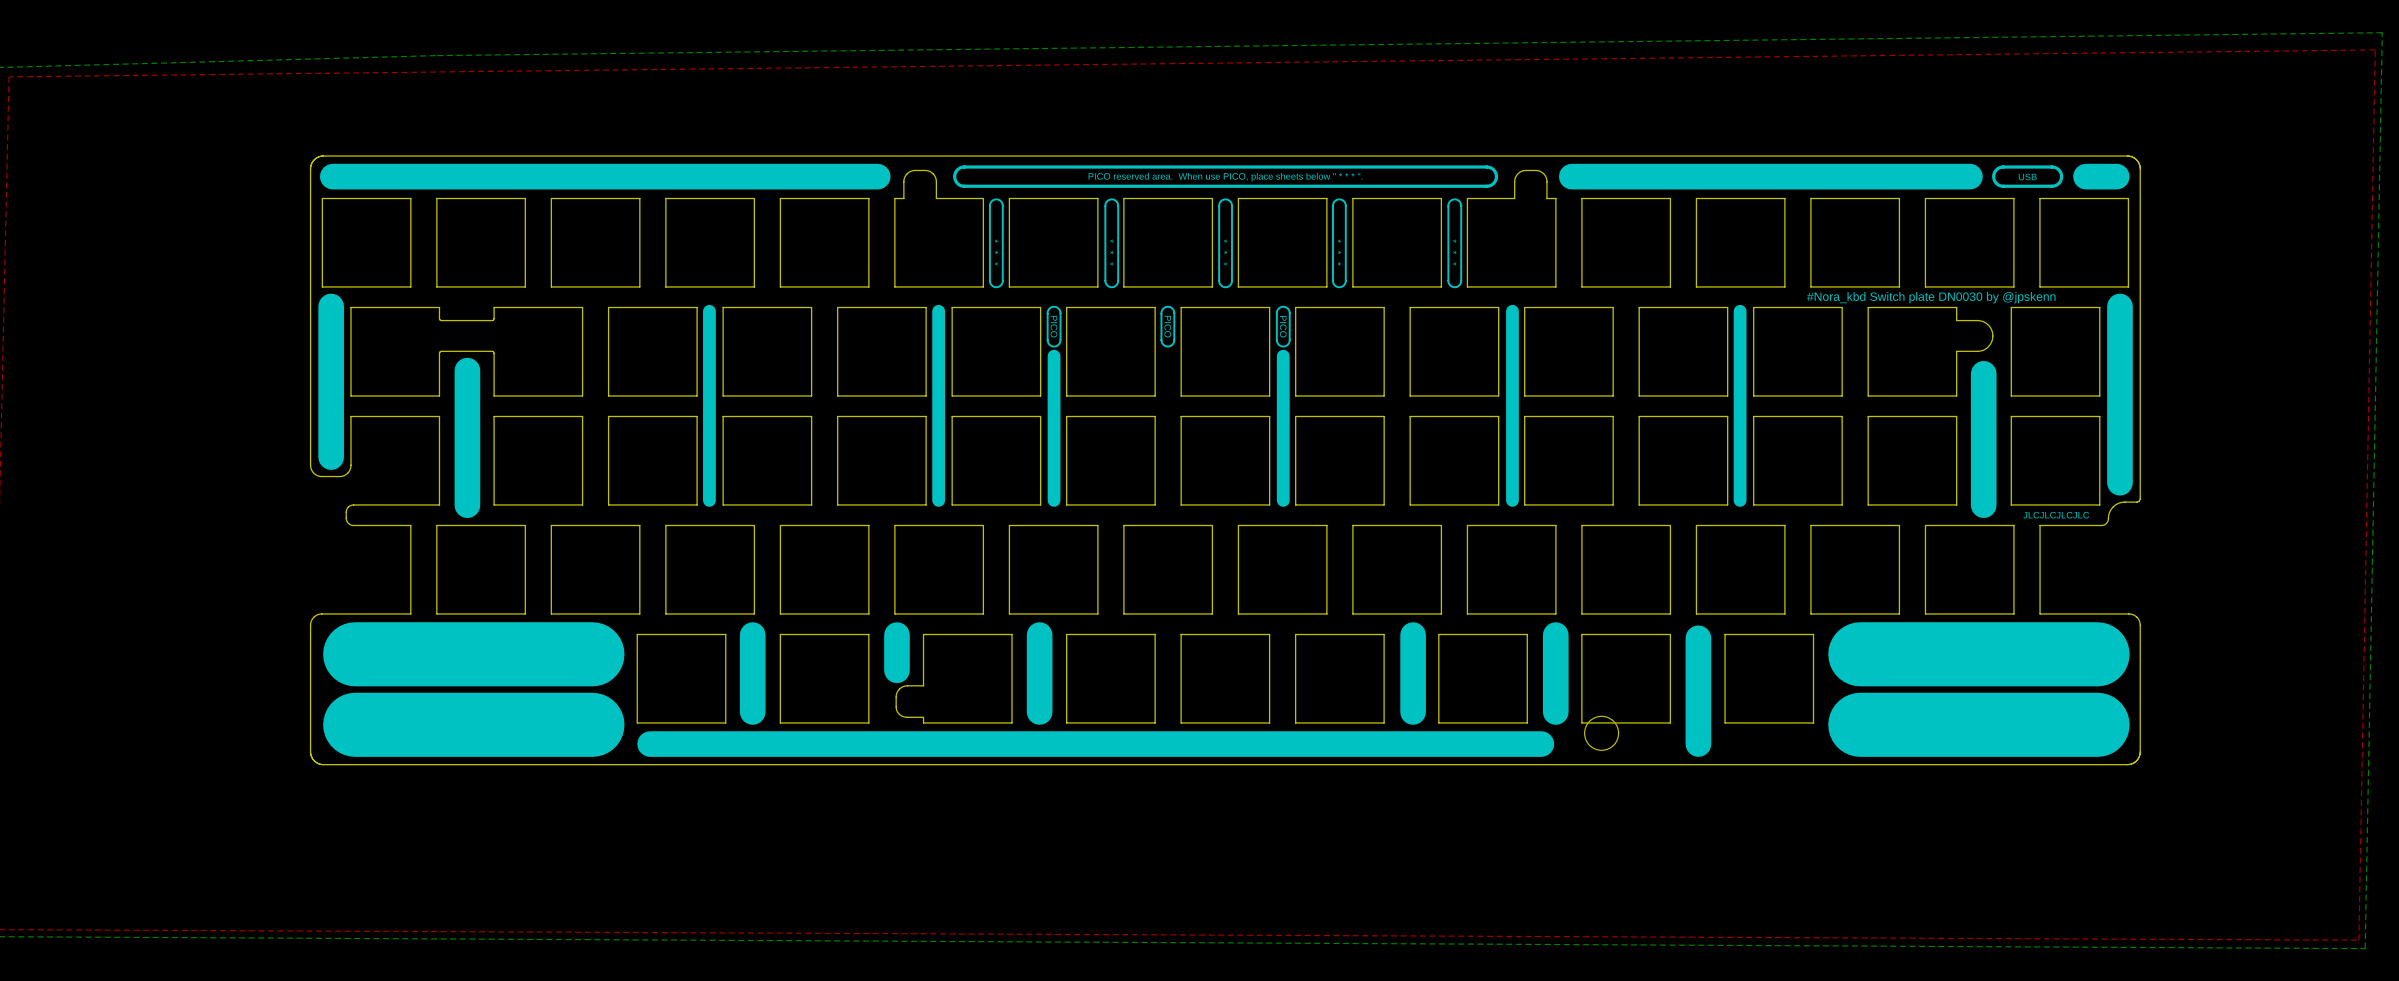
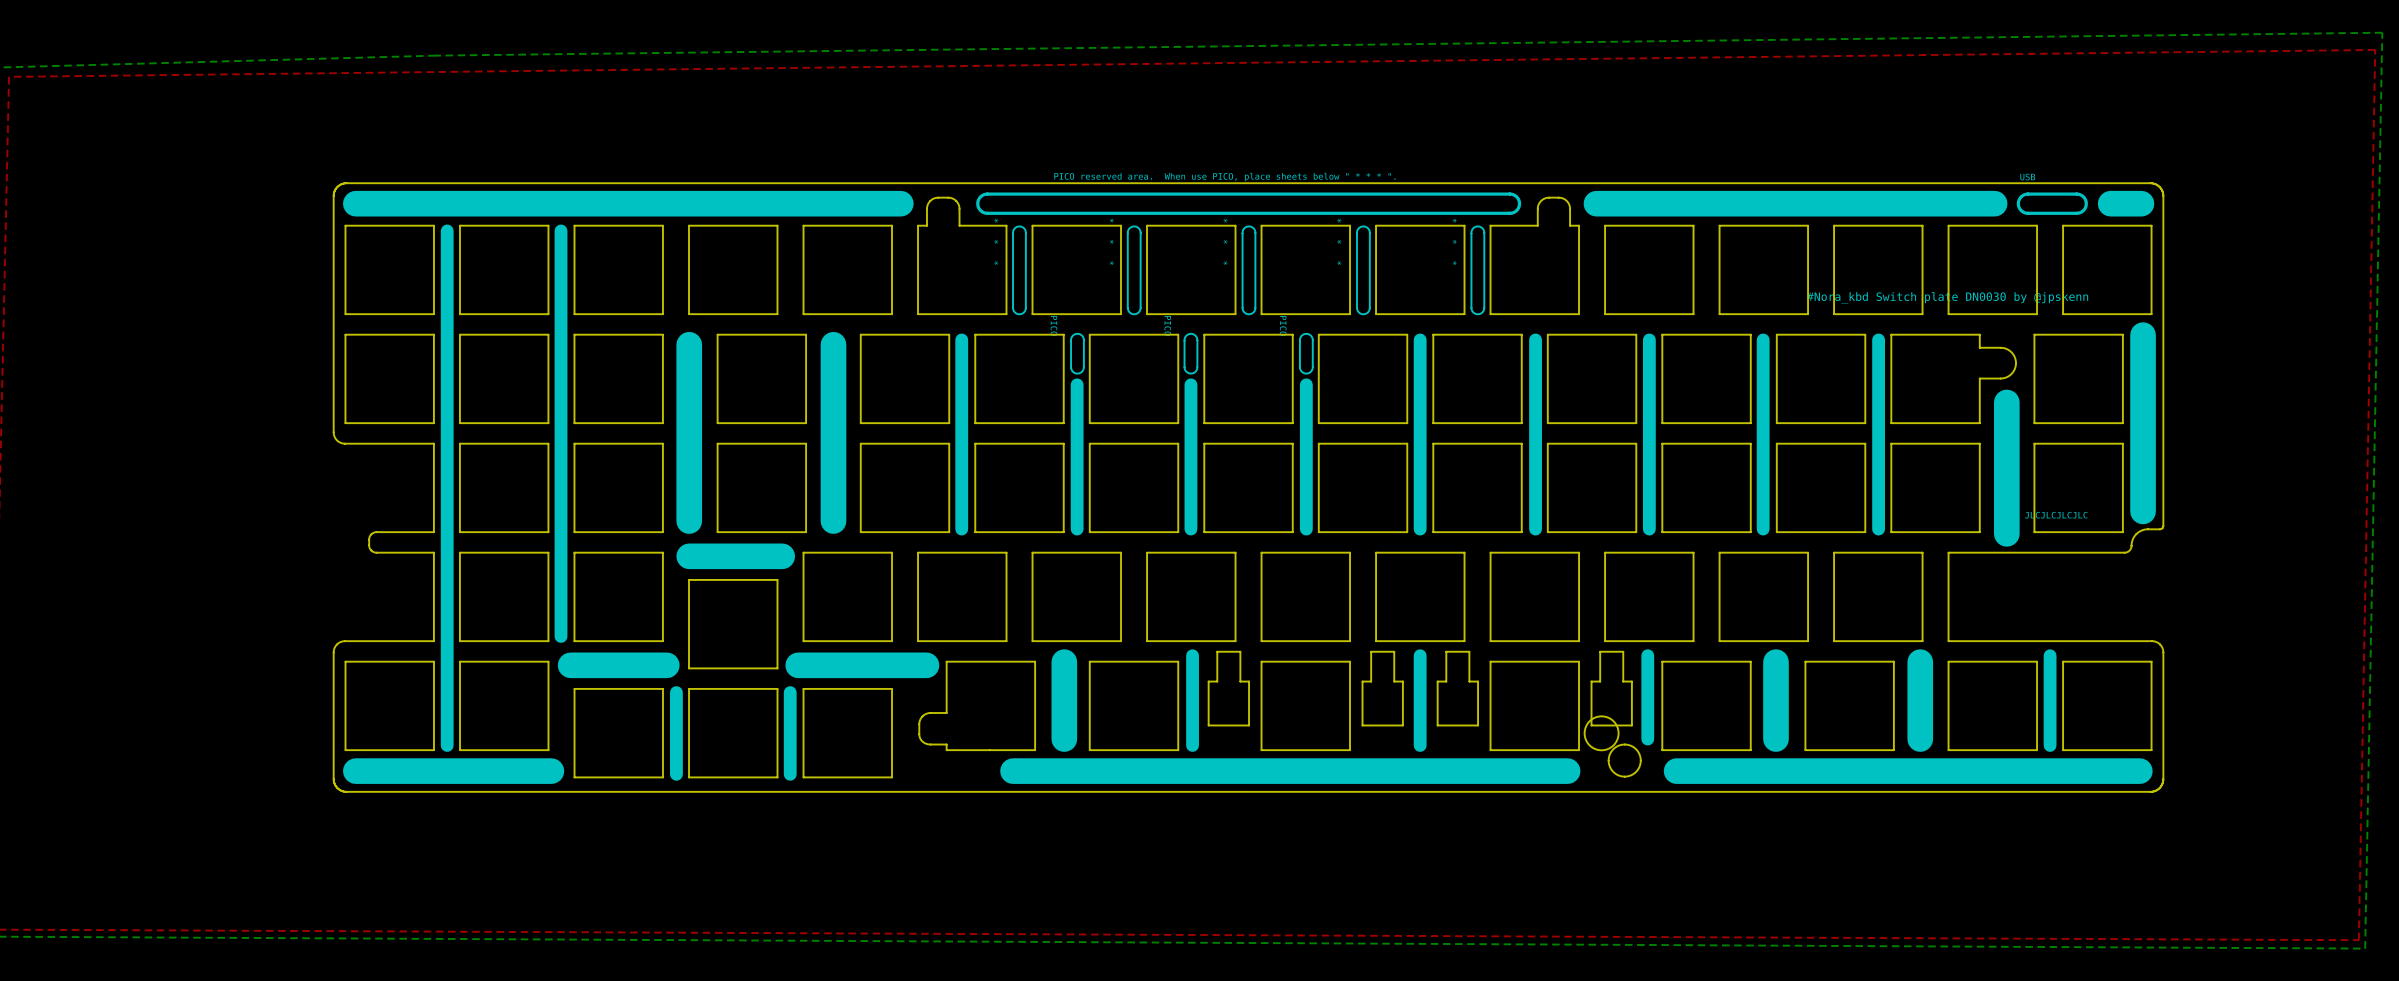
drawing: [309, 155, 2141, 766] -> none
line: (1486, 167) (964, 167) (957, 169) (954, 176) (957, 183) (964, 186) (1486, 186) (1493, 183) (1496, 176) (1493, 169) (1486, 167) -> (1509, 194) (987, 194) (980, 196) (977, 203) (980, 210) (987, 213) (1509, 213) (1516, 210) (1519, 203) (1516, 196) (1509, 194)
line: (2052, 167) (2002, 167) (1995, 170) (1993, 177) (1996, 183) (2002, 186) (2053, 186) (2058, 183) (2061, 176) (2058, 169) (2052, 167) -> (2076, 194) (2026, 194) (2020, 197) (2018, 204) (2021, 210) (2026, 213) (2077, 213) (2083, 210) (2086, 203) (2083, 196) (2076, 194)
line: (877, 176) (332, 176) -> (900, 203) (355, 203)
line: (1969, 176) (1571, 176) -> (1994, 203) (1596, 203)
line: (2116, 176) (2085, 176) -> (2141, 203) (2110, 203)
board edge: none -> (948, 197) (936, 197) (930, 200) (927, 207) (926, 225) (918, 225) (918, 314) (1006, 314) (1006, 225) (959, 225) (958, 204) (954, 199) (948, 197)
board edge: none -> (1558, 197) (1546, 197) (1540, 201) (1537, 207) (1537, 225) (1490, 225) (1490, 314) (1579, 314) (1579, 225) (1570, 225) (1569, 204) (1565, 199) (1558, 197)
line: (1002, 205) (1002, 281) (1000, 285) (995, 287) (989, 281) (989, 204) (992, 200) (996, 199) (1001, 201) (1002, 205) -> (1025, 232) (1025, 308) (1023, 312) (1018, 314) (1013, 308) (1013, 231) (1015, 227) (1019, 226) (1024, 228) (1025, 232)
line: (1118, 205) (1118, 281) (1116, 285) (1110, 287) (1105, 281) (1105, 204) (1107, 200) (1112, 199) (1116, 201) (1118, 205) -> (1140, 232) (1140, 308) (1138, 312) (1133, 314) (1127, 308) (1127, 231) (1130, 227) (1134, 226) (1138, 228) (1140, 232)
line: (1232, 205) (1231, 281) (1229, 285) (1224, 287) (1219, 281) (1219, 204) (1221, 200) (1226, 199) (1230, 201) (1232, 205) -> (1255, 232) (1255, 308) (1253, 312) (1248, 314) (1242, 308) (1242, 231) (1244, 227) (1249, 226) (1253, 228) (1255, 232)
line: (1345, 205) (1345, 281) (1343, 285) (1338, 287) (1333, 281) (1333, 204) (1335, 200) (1339, 199) (1344, 201) (1345, 205) -> (1369, 232) (1369, 308) (1367, 312) (1362, 314) (1357, 308) (1357, 231) (1359, 227) (1363, 226) (1368, 228) (1369, 232)
line: (1461, 205) (1461, 281) (1458, 286) (1454, 287) (1448, 281) (1448, 204) (1450, 200) (1455, 199) (1459, 201) (1461, 205) -> (1484, 232) (1484, 308) (1481, 313) (1477, 314) (1471, 308) (1471, 231) (1473, 227) (1478, 226) (1482, 228) (1484, 232)
board edge: none -> (433, 225) (433, 314) (345, 314) (345, 225) (433, 225)
board edge: none -> (548, 225) (548, 314) (459, 314) (459, 225) (548, 225)
board edge: none -> (662, 225) (662, 314) (574, 314) (574, 225) (662, 225)
board edge: none -> (777, 225) (777, 314) (688, 314) (688, 225) (777, 225)
board edge: none -> (891, 225) (891, 314) (803, 314) (803, 225) (891, 225)
board edge: none -> (1120, 225) (1120, 314) (1032, 314) (1032, 225) (1120, 225)
board edge: none -> (1235, 225) (1235, 314) (1147, 314) (1147, 225) (1235, 225)
board edge: none -> (1350, 225) (1350, 314) (1261, 314) (1261, 225) (1350, 225)
board edge: none -> (1464, 225) (1464, 314) (1376, 314) (1376, 225) (1464, 225)
board edge: none -> (1693, 225) (1693, 314) (1605, 314) (1605, 225) (1693, 225)
board edge: none -> (1808, 225) (1808, 314) (1719, 314) (1719, 225) (1808, 225)
board edge: none -> (1922, 225) (1922, 314) (1834, 314) (1834, 225) (1922, 225)
board edge: none -> (2037, 225) (2037, 314) (1948, 314) (1948, 225) (2037, 225)
board edge: none -> (2151, 225) (2151, 314) (2063, 314) (2063, 225) (2151, 225)
line: none -> (447, 230) (447, 745)
line: none -> (561, 230) (561, 636)
line: (331, 306) (331, 457) -> none
line: (2119, 306) (2119, 482) -> (2143, 335) (2143, 511)
line: (709, 311) (709, 500) -> none
line: (938, 311) (938, 500) -> (961, 339) (961, 529)
line: (1512, 311) (1512, 500) -> (1535, 339) (1535, 529)
line: (1740, 311) (1740, 500) -> (1763, 339) (1763, 529)
board edge: none -> (433, 334) (345, 334) (345, 423) (433, 423) (433, 334)
board edge: none -> (548, 334) (459, 334) (459, 423) (548, 423) (548, 334)
board edge: none -> (662, 334) (574, 334) (574, 423) (662, 423) (662, 334)
board edge: none -> (806, 334) (717, 334) (717, 423) (806, 423) (806, 334)
board edge: none -> (949, 334) (860, 334) (860, 423) (949, 423) (949, 334)
board edge: none -> (1063, 334) (975, 334) (975, 423) (1063, 423) (1063, 334)
board edge: none -> (1178, 334) (1178, 423) (1089, 423) (1089, 334) (1178, 334)
board edge: none -> (1292, 334) (1204, 334) (1204, 423) (1292, 423) (1292, 334)
board edge: none -> (1407, 334) (1318, 334) (1318, 423) (1407, 423) (1407, 334)
board edge: none -> (1521, 334) (1433, 334) (1433, 423) (1521, 423) (1521, 334)
board edge: none -> (1636, 334) (1547, 334) (1547, 423) (1636, 423) (1636, 334)
board edge: none -> (1750, 334) (1662, 334) (1662, 423) (1750, 423) (1750, 334)
board edge: none -> (1865, 334) (1865, 423) (1776, 423) (1776, 334) (1865, 334)
board edge: none -> (1979, 334) (1891, 334) (1891, 423) (1979, 423) (1979, 378) (2006, 377) (2013, 371) (2015, 363) (2013, 354) (2006, 348) (1979, 347) (1979, 334)
board edge: none -> (2122, 334) (2034, 334) (2034, 423) (2122, 423) (2122, 334)
line: (1060, 339) (1060, 311) (1053, 306) (1047, 312) (1047, 340) -> (1083, 366) (1083, 338) (1077, 333) (1071, 339) (1071, 367)
line: (1174, 339) (1174, 311) (1167, 306) (1161, 312) (1161, 340) -> (1197, 366) (1197, 338) (1190, 333) (1184, 339) (1184, 367)
line: (1289, 339) (1289, 311) (1282, 306) (1276, 312) (1276, 340) -> (1312, 366) (1312, 338) (1306, 333) (1299, 339) (1299, 367)
line: none -> (1420, 339) (1420, 529)
line: none -> (1649, 339) (1649, 529)
line: none -> (1878, 339) (1878, 529)
line: (1060, 340) (1058, 344) (1054, 346) (1049, 344) (1047, 340) -> (1083, 367) (1081, 371) (1077, 373) (1073, 371) (1071, 367)
line: (1174, 340) (1172, 344) (1167, 346) (1163, 344) (1161, 340) -> (1197, 367) (1195, 371) (1190, 373) (1186, 371) (1184, 367)
line: (1289, 340) (1287, 344) (1283, 346) (1279, 344) (1276, 340) -> (1312, 367) (1310, 371) (1306, 373) (1302, 371) (1299, 367)
line: none -> (689, 344) (689, 521)
line: none -> (833, 344) (833, 521)
line: (1054, 356) (1054, 500) -> (1077, 384) (1077, 529)
line: (1283, 356) (1283, 500) -> (1306, 384) (1306, 529)
line: (467, 370) (467, 505) -> none
line: (1983, 373) (1983, 505) -> (2006, 402) (2006, 533)
line: none -> (1190, 384) (1190, 529)
board edge: none -> (548, 443) (459, 443) (459, 532) (548, 532) (548, 443)
board edge: none -> (662, 443) (574, 443) (574, 532) (662, 532) (662, 443)
board edge: none -> (806, 443) (717, 443) (717, 532) (806, 532) (806, 443)
board edge: none -> (949, 443) (860, 443) (860, 532) (949, 532) (949, 443)
board edge: none -> (1063, 443) (975, 443) (975, 532) (1063, 532) (1063, 443)
board edge: none -> (1178, 443) (1089, 443) (1089, 532) (1178, 532) (1178, 443)
board edge: none -> (1292, 443) (1204, 443) (1204, 532) (1292, 532) (1292, 443)
board edge: none -> (1407, 443) (1318, 443) (1318, 532) (1407, 532) (1407, 443)
board edge: none -> (1521, 443) (1433, 443) (1433, 532) (1521, 532) (1521, 443)
board edge: none -> (1636, 443) (1547, 443) (1547, 532) (1636, 532) (1636, 443)
board edge: none -> (1750, 443) (1662, 443) (1662, 532) (1750, 532) (1750, 443)
board edge: none -> (1865, 443) (1776, 443) (1776, 532) (1865, 532) (1865, 443)
board edge: none -> (1979, 443) (1891, 443) (1891, 532) (1979, 532) (1979, 443)
board edge: none -> (2122, 443) (2034, 443) (2034, 532) (2122, 532) (2122, 443)
board edge: none -> (2131, 545) (2129, 550) (2124, 552) (1948, 552) (1948, 641) (2152, 641) (2158, 643) (2163, 651) (2163, 779) (2160, 787) (2152, 791) (343, 791) (336, 787) (333, 780) (333, 652) (335, 646) (344, 641) (433, 641) (433, 552) (375, 552) (371, 550) (369, 545) (369, 536) (375, 532) (433, 532) (433, 443) (343, 443) (338, 441) (334, 436) (333, 194) (338, 186) (346, 183) (2152, 183) (2160, 187) (2163, 196) (2163, 526) (2160, 529) (2139, 531) (2133, 537) (2131, 545)
board edge: none -> (548, 552) (459, 552) (459, 641) (548, 641) (548, 552)
board edge: none -> (662, 552) (574, 552) (574, 641) (662, 641) (662, 552)
board edge: none -> (892, 552) (803, 552) (803, 641) (892, 641) (892, 552)
board edge: none -> (1006, 552) (918, 552) (918, 641) (1006, 641) (1006, 552)
board edge: none -> (1121, 552) (1032, 552) (1032, 641) (1121, 641) (1121, 552)
board edge: none -> (1235, 552) (1147, 552) (1147, 641) (1235, 641) (1235, 552)
board edge: none -> (1350, 552) (1261, 552) (1261, 641) (1350, 641) (1350, 552)
board edge: none -> (1464, 552) (1376, 552) (1376, 641) (1464, 641) (1464, 552)
board edge: none -> (1579, 552) (1490, 552) (1490, 641) (1579, 641) (1579, 552)
board edge: none -> (1693, 552) (1605, 552) (1605, 641) (1693, 641) (1693, 552)
board edge: none -> (1808, 552) (1719, 552) (1719, 641) (1808, 641) (1808, 552)
board edge: none -> (1922, 552) (1834, 552) (1834, 641) (1922, 641) (1922, 552)
line: none -> (782, 556) (689, 556)
board edge: none -> (777, 579) (688, 579) (688, 668) (777, 668) (777, 579)
line: (752, 635) (752, 712) -> none
line: (896, 635) (896, 670) -> none
line: (1039, 635) (1039, 712) -> (1064, 662) (1064, 739)
line: (1413, 635) (1413, 712) -> none
line: (1555, 635) (1555, 712) -> none
line: (1698, 638) (1698, 744) -> none
board edge: none -> (1240, 651) (1217, 651) (1217, 681) (1208, 681) (1208, 725) (1249, 725) (1249, 681) (1240, 681) (1240, 651)
board edge: none -> (1394, 651) (1371, 651) (1371, 681) (1362, 681) (1362, 725) (1402, 725) (1402, 681) (1394, 681) (1394, 651)
board edge: none -> (1469, 651) (1446, 651) (1446, 681) (1437, 681) (1437, 725) (1478, 725) (1478, 681) (1469, 681) (1469, 651)
board edge: none -> (1623, 651) (1600, 651) (1600, 681) (1591, 681) (1591, 725) (1631, 725) (1631, 681) (1623, 681) (1623, 651)
line: (592, 654) (355, 654) -> none
line: (2097, 654) (1860, 654) -> none
line: none -> (1192, 655) (1192, 745)
line: none -> (1420, 655) (1420, 745)
line: none -> (1647, 655) (1647, 739)
line: none -> (2050, 655) (2050, 745)
board edge: none -> (433, 661) (345, 661) (345, 750) (433, 750) (433, 661)
board edge: none -> (548, 661) (460, 661) (460, 750) (548, 750) (548, 661)
board edge: none -> (1035, 661) (946, 661) (946, 713) (928, 713) (922, 716) (919, 723) (921, 740) (928, 744) (946, 744) (946, 750) (1035, 750) (1035, 661)
board edge: none -> (1178, 661) (1089, 661) (1089, 750) (1178, 750) (1178, 661)
board edge: none -> (1350, 661) (1261, 661) (1261, 750) (1350, 750) (1350, 661)
board edge: none -> (1579, 661) (1490, 661) (1490, 750) (1579, 750) (1579, 661)
board edge: none -> (1750, 661) (1662, 661) (1662, 750) (1750, 750) (1750, 661)
board edge: none -> (1893, 661) (1805, 661) (1805, 750) (1893, 750) (1893, 661)
board edge: none -> (2037, 661) (1948, 661) (1948, 750) (2037, 750) (2037, 661)
board edge: none -> (2151, 661) (2063, 661) (2063, 750) (2151, 750) (2151, 661)
line: none -> (1776, 662) (1776, 739)
line: none -> (1920, 662) (1920, 739)
line: none -> (666, 665) (570, 665)
line: none -> (926, 665) (798, 665)
board edge: none -> (663, 688) (574, 688) (574, 777) (663, 777) (663, 688)
board edge: none -> (777, 688) (777, 777) (689, 777) (689, 688) (777, 688)
board edge: none -> (892, 688) (803, 688) (803, 777) (892, 777) (892, 688)
line: none -> (676, 692) (676, 774)
line: none -> (790, 692) (790, 774)
line: (592, 724) (355, 724) -> none
line: (2097, 724) (1860, 724) -> none
line: (1541, 744) (650, 744) -> none
board edge: none -> (1624, 744) (1613, 749) (1608, 760) (1613, 771) (1624, 776) (1636, 771) (1640, 760) (1636, 749) (1624, 744)
line: none -> (551, 771) (355, 771)
line: none -> (1567, 771) (1013, 771)
line: none -> (2139, 771) (1676, 771)

